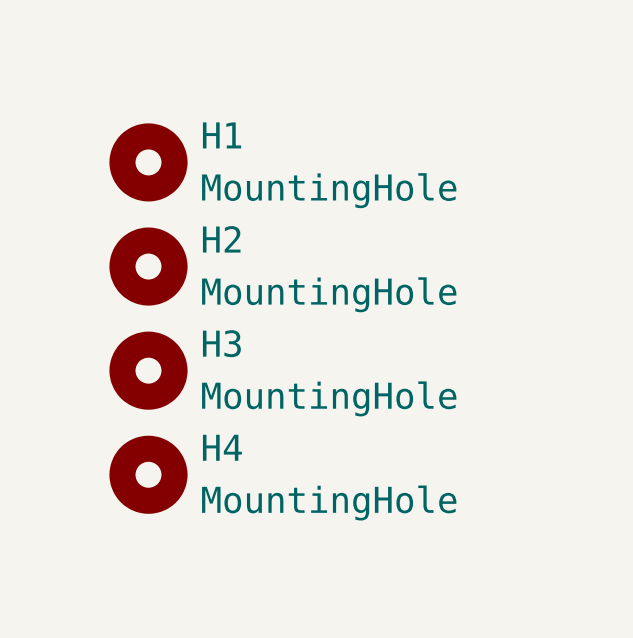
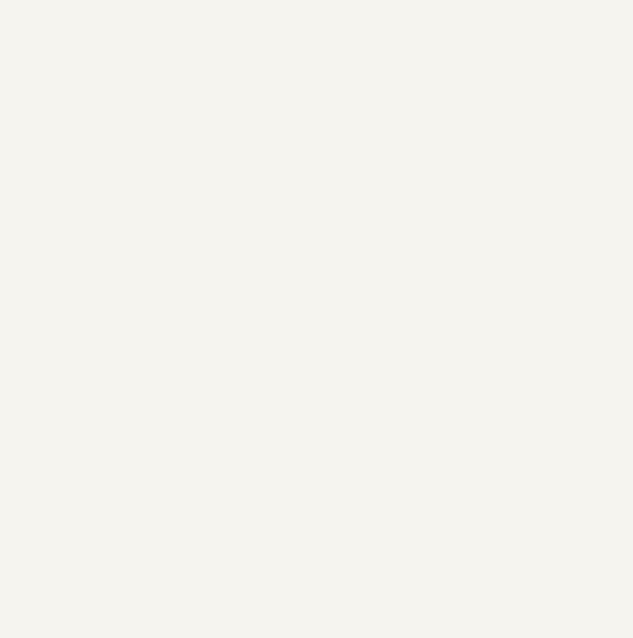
H1: MountingHole (148, 162) -> none
H2: MountingHole (148, 266) -> none
H3: MountingHole (148, 370) -> none
H4: MountingHole (148, 474) -> none

